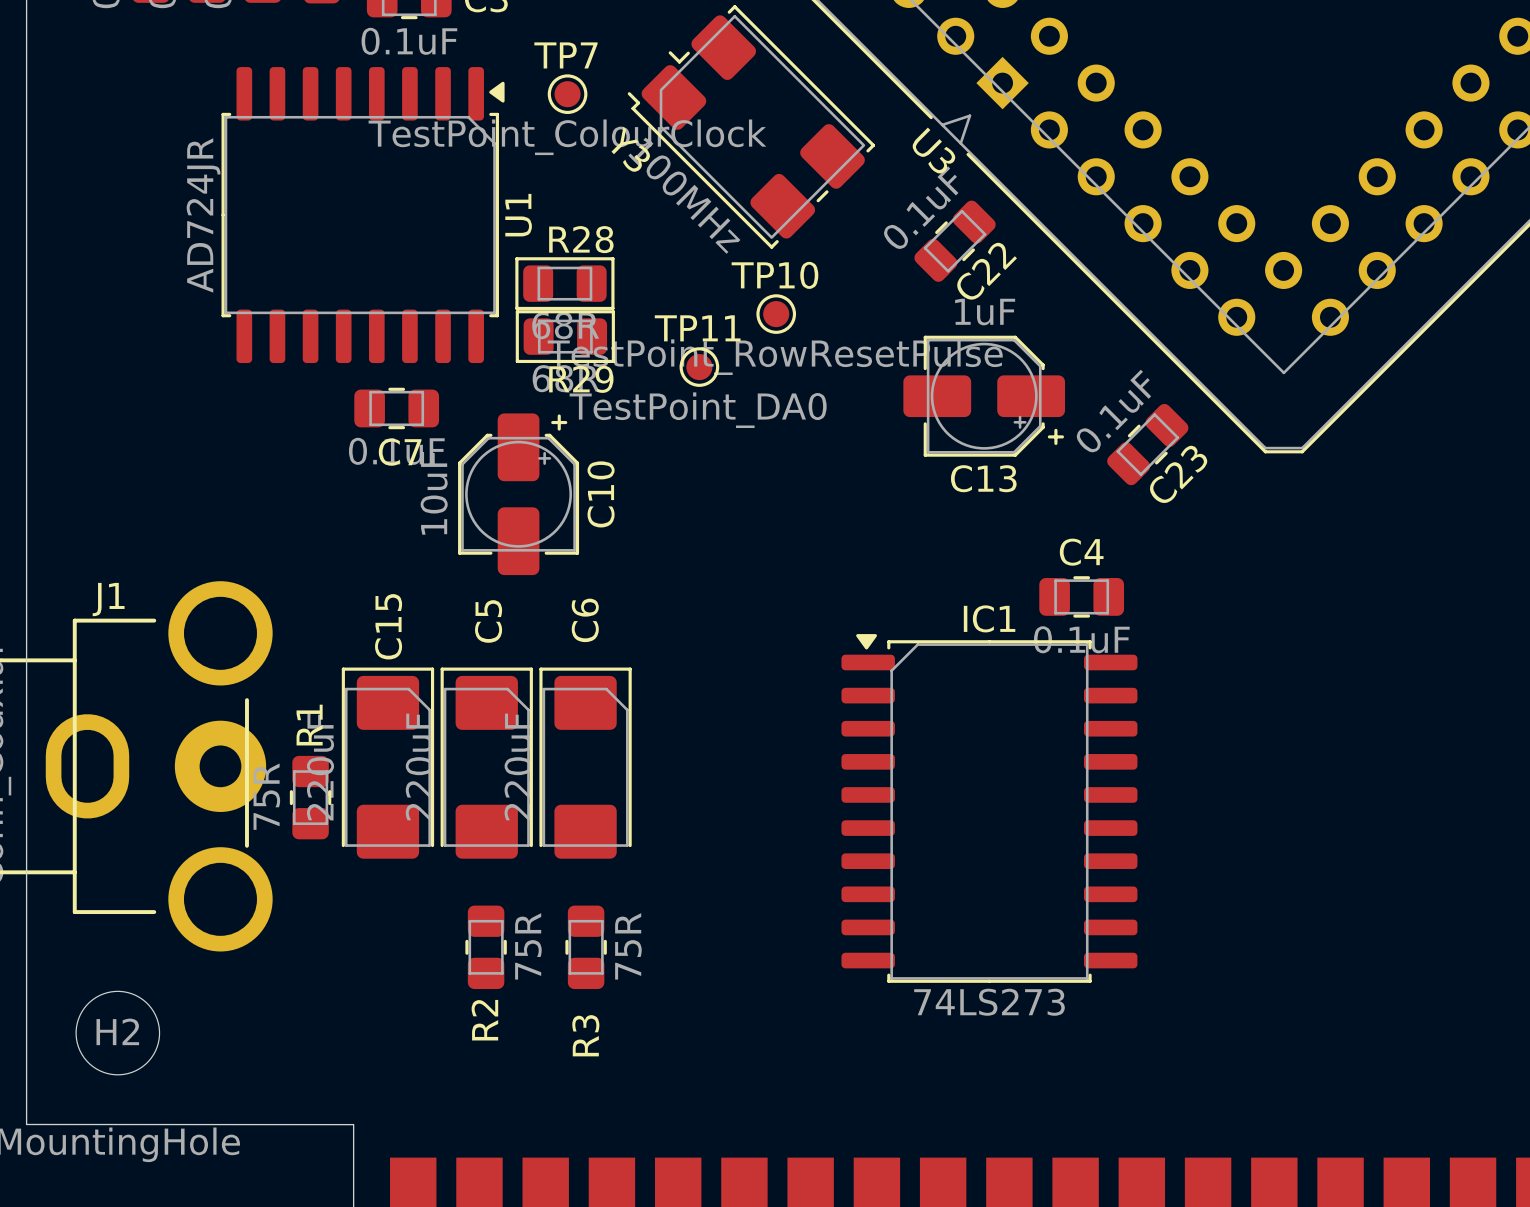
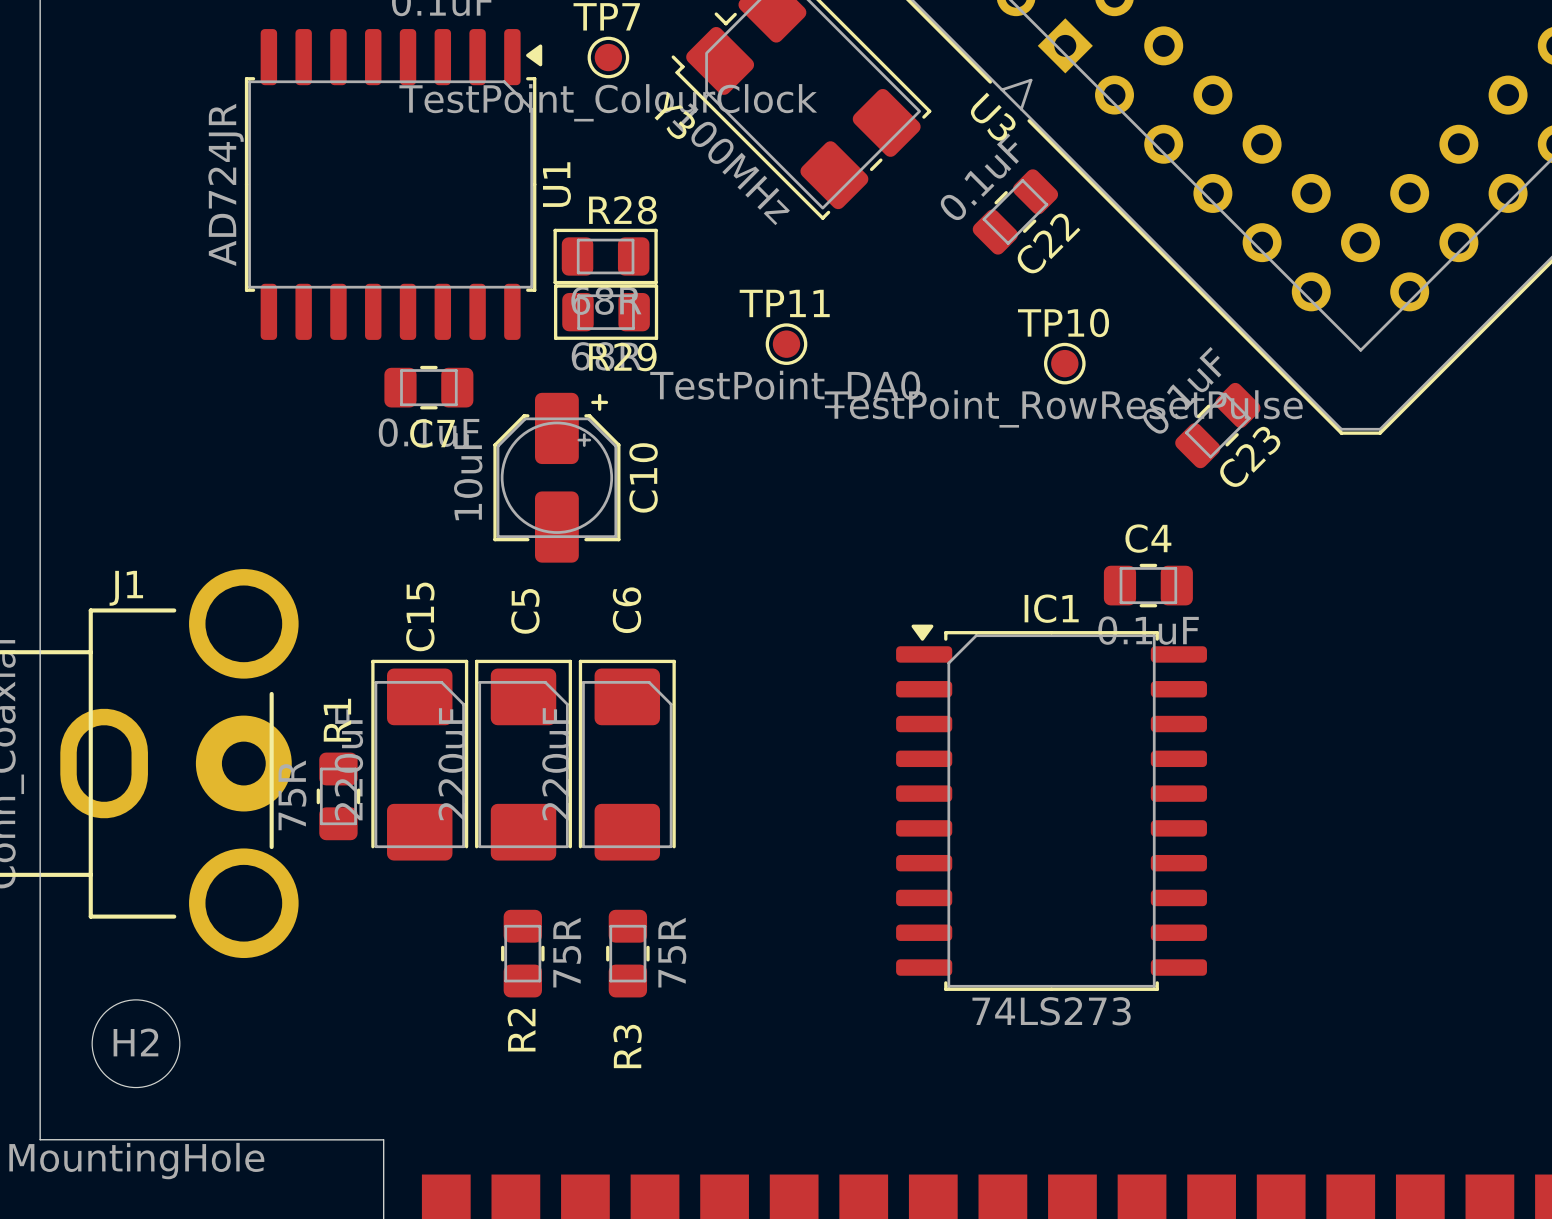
TP10 position: (776, 314) -> (1064, 363)
TP11 position: (699, 367) -> (786, 344)
C13: 1uF (984, 396) -> none

